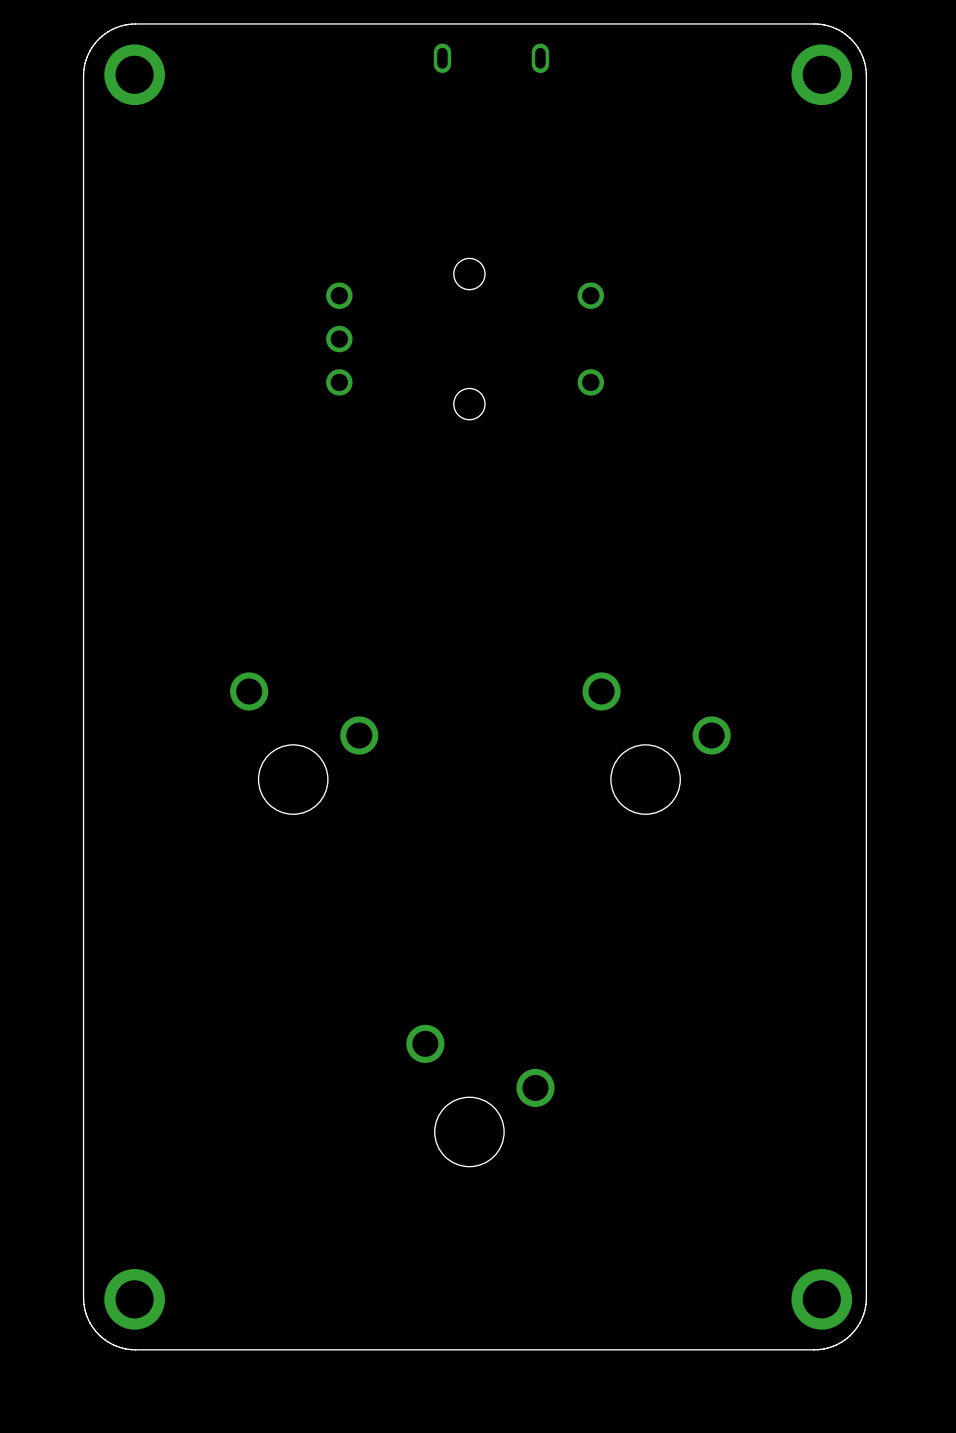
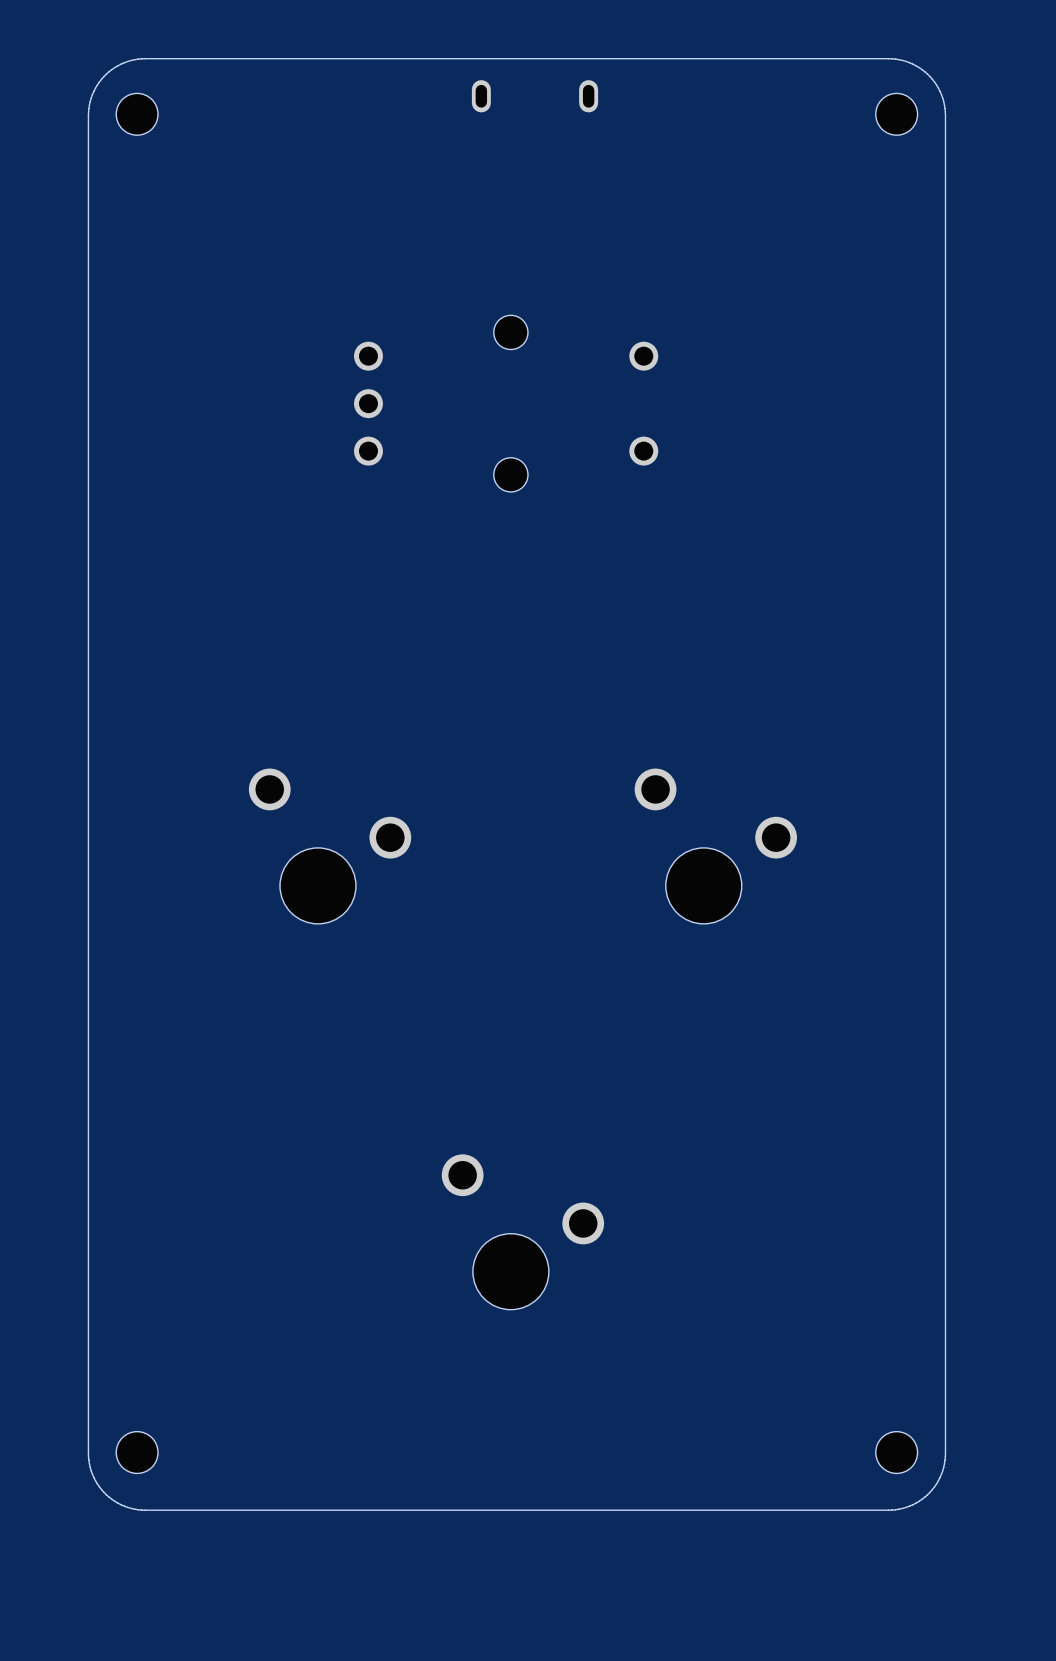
part footprint: [104, 44, 165, 106] -> [116, 93, 159, 136]
part footprint: [791, 44, 853, 106] -> [875, 93, 918, 136]
part footprint: [104, 1269, 165, 1330] -> [116, 1431, 159, 1474]
part footprint: [791, 1269, 853, 1330] -> [875, 1431, 918, 1474]

